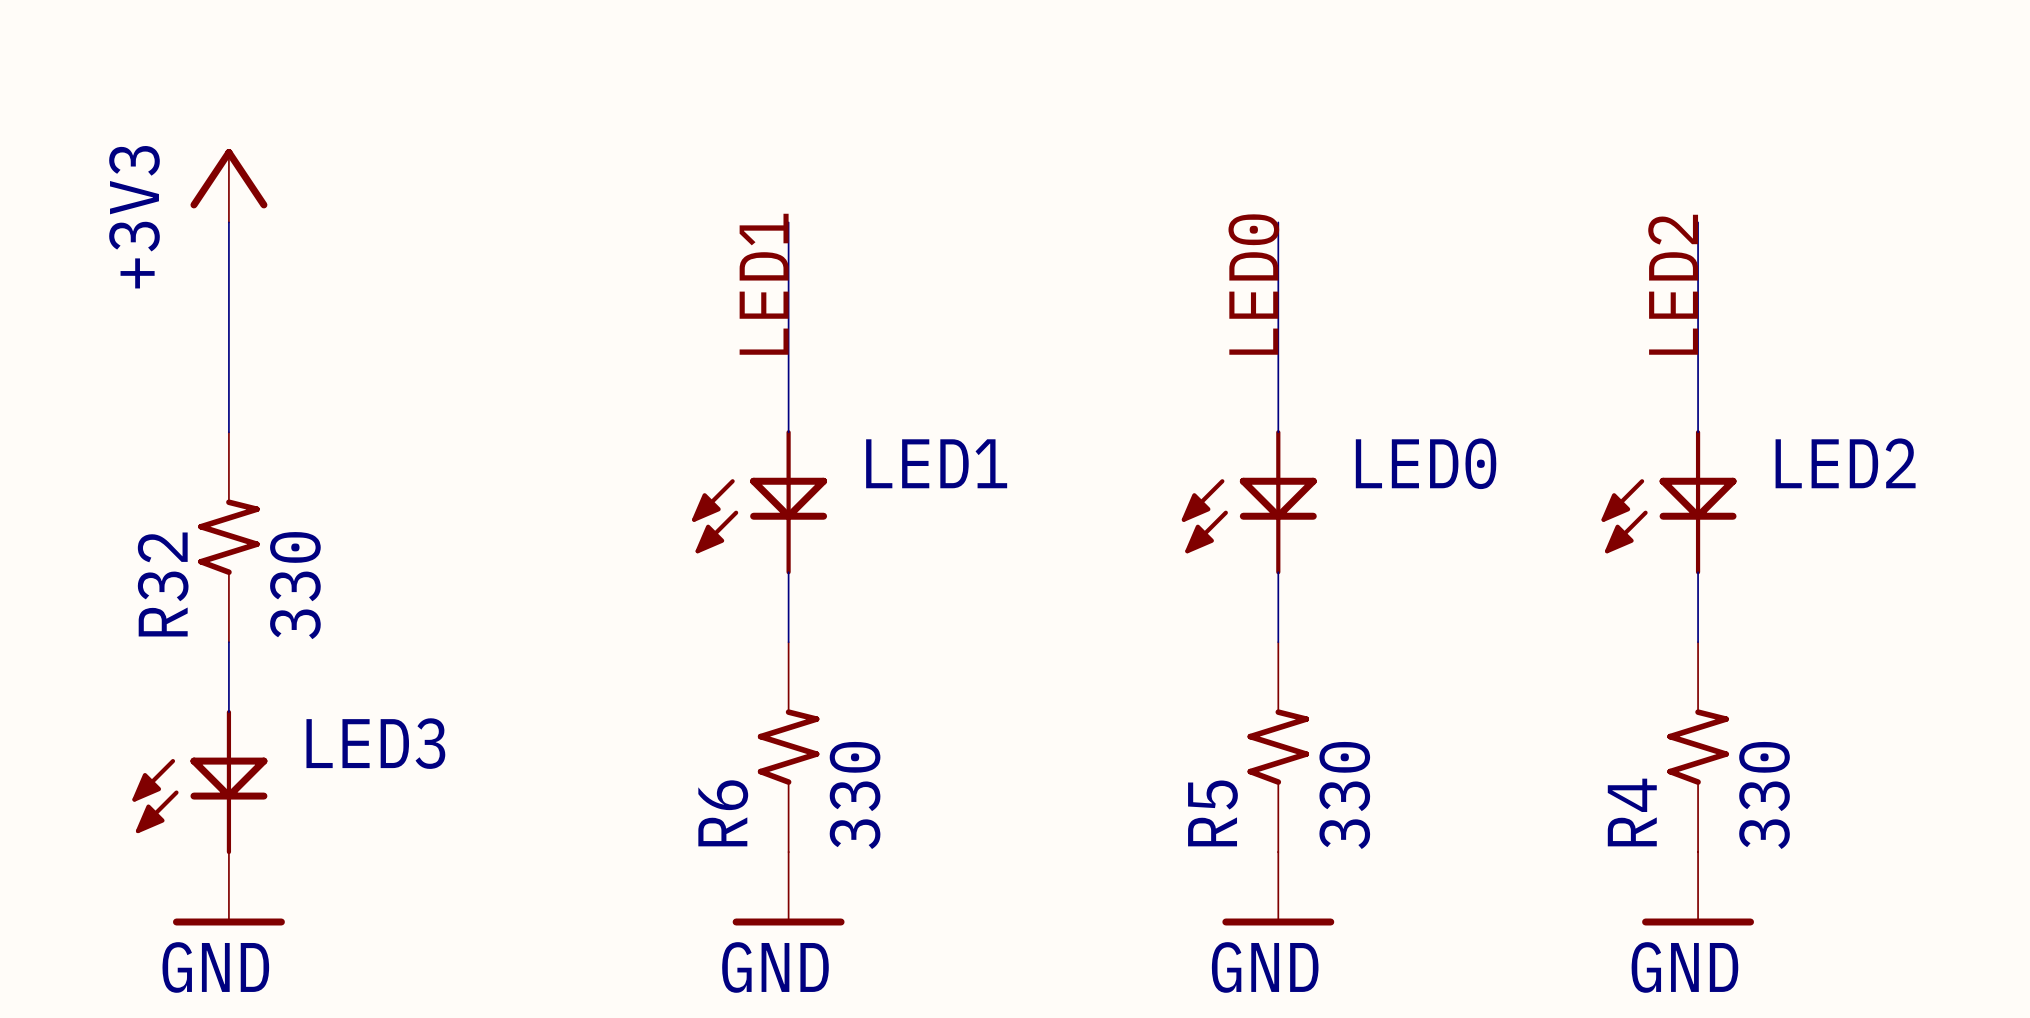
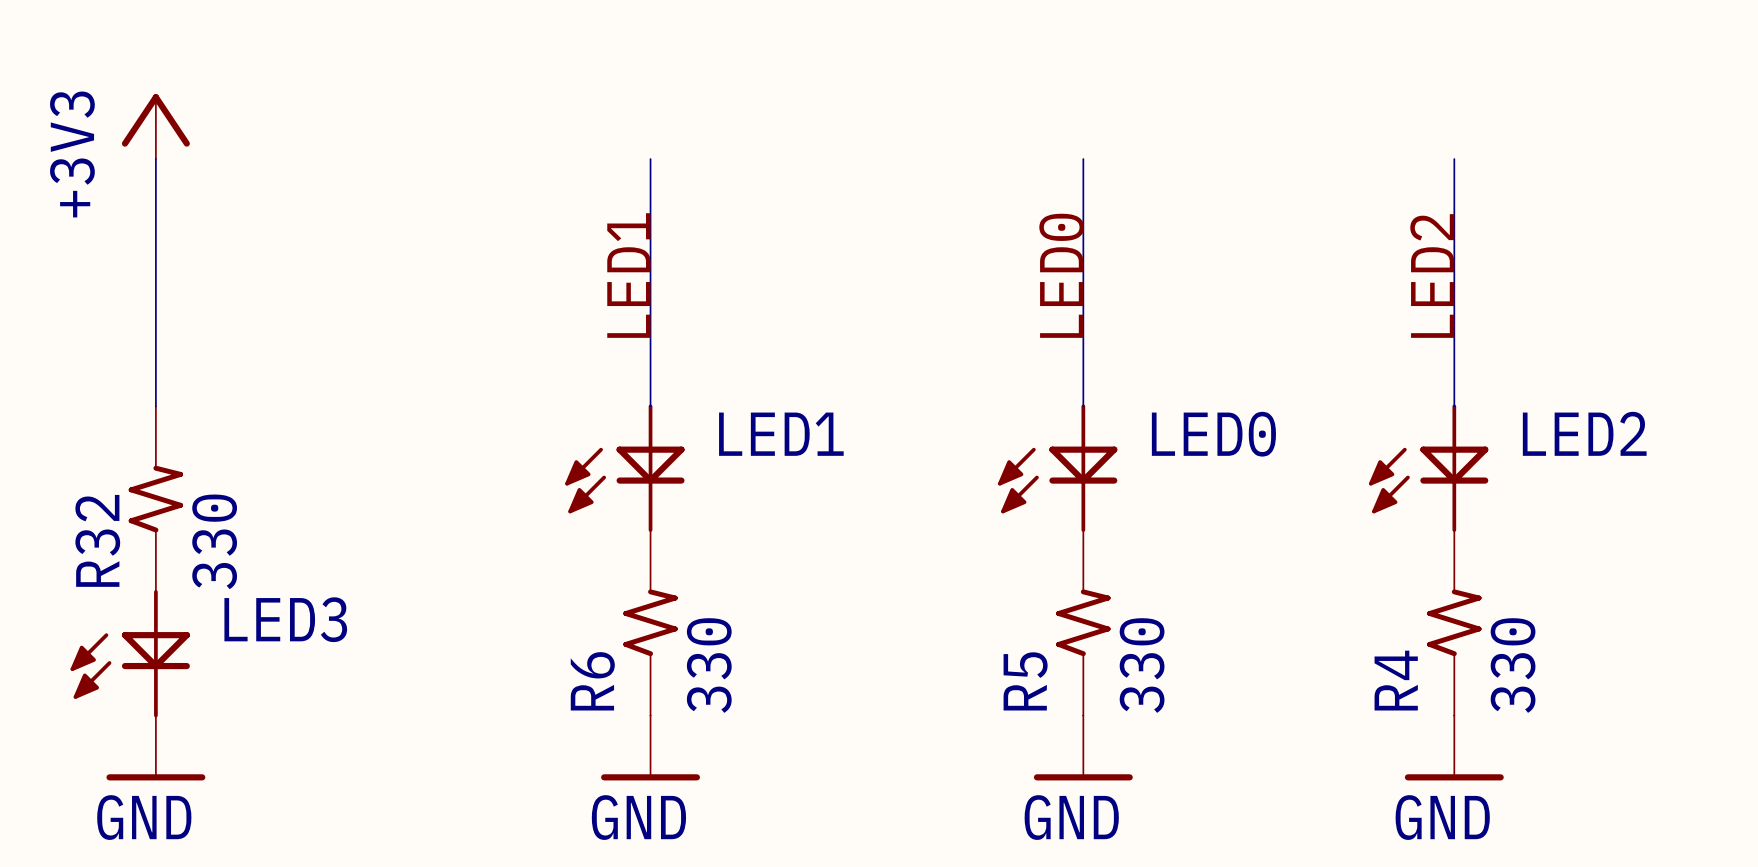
label position: LED1 (764, 284) -> LED1 (628, 275)
label position: LED0 (1253, 284) -> LED0 (1061, 275)
label position: LED2 (1673, 284) -> LED2 (1432, 275)
LED1 position: (759, 502) -> (624, 468)
LED0 position: (1249, 502) -> (1057, 468)
LED2 position: (1669, 502) -> (1428, 468)
R32 position: (228, 537) -> (155, 499)

